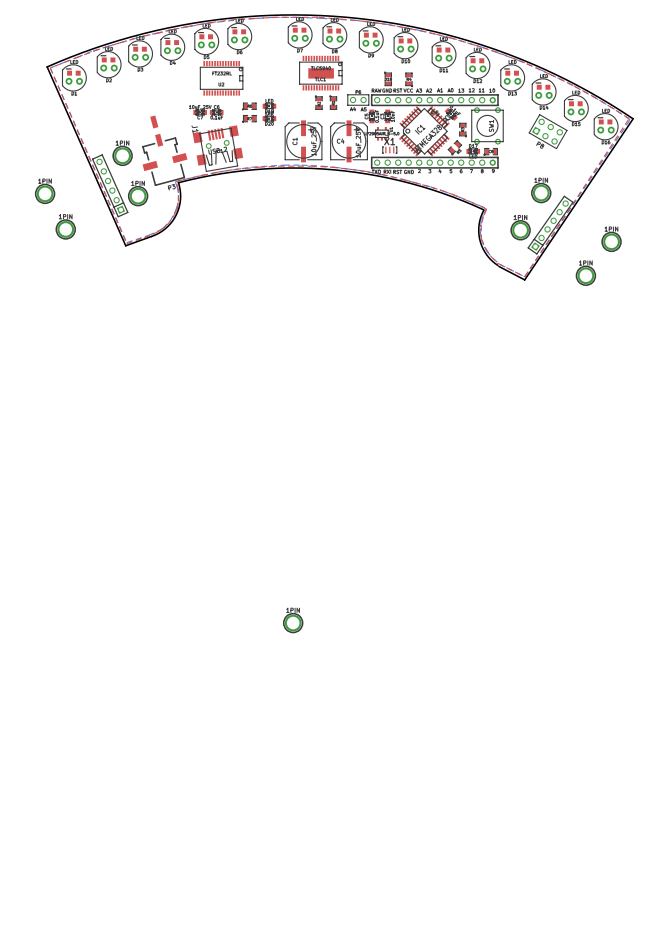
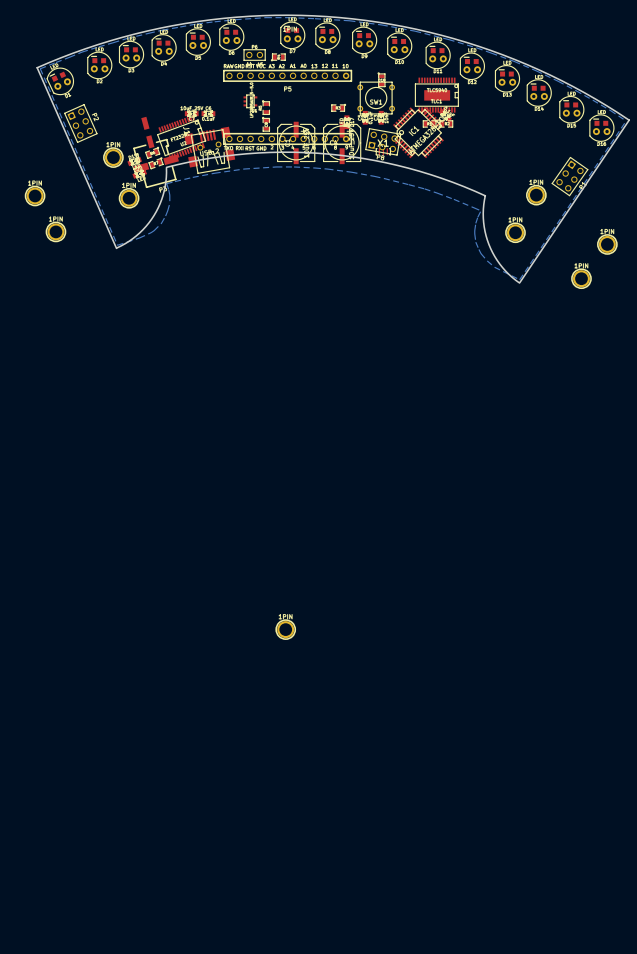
top zone outline: (277, 17) (318, 17) (365, 21) (451, 38) (524, 62) (573, 85) (629, 118) (524, 276) (497, 263) (485, 247) (481, 238) (481, 225) (486, 209) (483, 207) (439, 189) (403, 179) (365, 171) (331, 167) (278, 166) (235, 169) (176, 181) (178, 189) (177, 208) (167, 225) (152, 234) (126, 243) (50, 67) (98, 49) (144, 35) (211, 22) (277, 17) -> none
part: none -> (290, 29)
part position: (320, 73) -> (436, 95)
part rotation: 0° (74, 77) -> 25° counterclockwise (60, 81)
part rotation: 0° (221, 78) -> 20° counterclockwise (181, 137)
part position: (221, 78) -> (181, 137)
part rotation: 0° (409, 79) -> 90° clockwise (278, 57)
part position: (409, 79) -> (278, 57)
part position: (358, 100) -> (254, 55)
part position: (434, 100) -> (287, 75)
part rotation: 0° (318, 102) -> 90° counterclockwise (445, 124)
part position: (318, 102) -> (445, 124)
part rotation: 0° (333, 102) -> 90° clockwise (430, 123)
part position: (333, 102) -> (430, 123)
part rotation: 0° (249, 106) -> 160° clockwise (152, 152)
part position: (249, 106) -> (152, 152)
part rotation: 0° (269, 106) -> 160° clockwise (134, 161)
part position: (269, 106) -> (134, 161)
part rotation: 0° (249, 118) -> 160° clockwise (156, 163)
part position: (249, 118) -> (156, 163)
part rotation: 0° (269, 118) -> 160° clockwise (139, 174)
part position: (269, 118) -> (139, 174)
part: none -> (80, 123)
part rotation: 0° (487, 125) -> 90° clockwise (376, 98)
part position: (487, 125) -> (376, 98)
part rotation: 0° (463, 130) -> 90° counterclockwise (338, 107)
part position: (463, 130) -> (338, 107)
part rotation: 0° (548, 131) -> 20° counterclockwise (383, 141)
part position: (548, 131) -> (383, 141)
part rotation: 0° (381, 133) -> 90° clockwise (250, 101)
part position: (381, 133) -> (250, 101)
part: none -> (287, 138)
part rotation: 0° (454, 147) -> 135° clockwise (266, 107)
part position: (454, 147) -> (266, 107)
part rotation: 0° (473, 151) -> 90° clockwise (346, 122)
part position: (473, 151) -> (346, 122)
part rotation: 0° (490, 151) -> 90° clockwise (266, 124)
part position: (490, 151) -> (266, 124)
part: (434, 162) -> none
board edge: none -> (166, 167) (212, 157) (246, 153) (281, 152) (328, 154) (374, 160) (408, 168) (442, 178) (485, 195)
board edge: none -> (166, 168) (163, 194) (154, 215) (139, 232) (117, 247)
part: none -> (570, 176)
part: (110, 185) -> none
board edge: none -> (485, 195) (483, 218) (488, 244) (499, 263) (519, 282)
board edge: (484, 209) (421, 186) (366, 174) (311, 168) (244, 170) (178, 182) (180, 195) (179, 205) (170, 223) (157, 233) (125, 245) -> none
board edge: (483, 210) (479, 225) (480, 240) (486, 254) (497, 265) -> none
part: (550, 225) -> none
board edge: (498, 266) (524, 279) -> none

